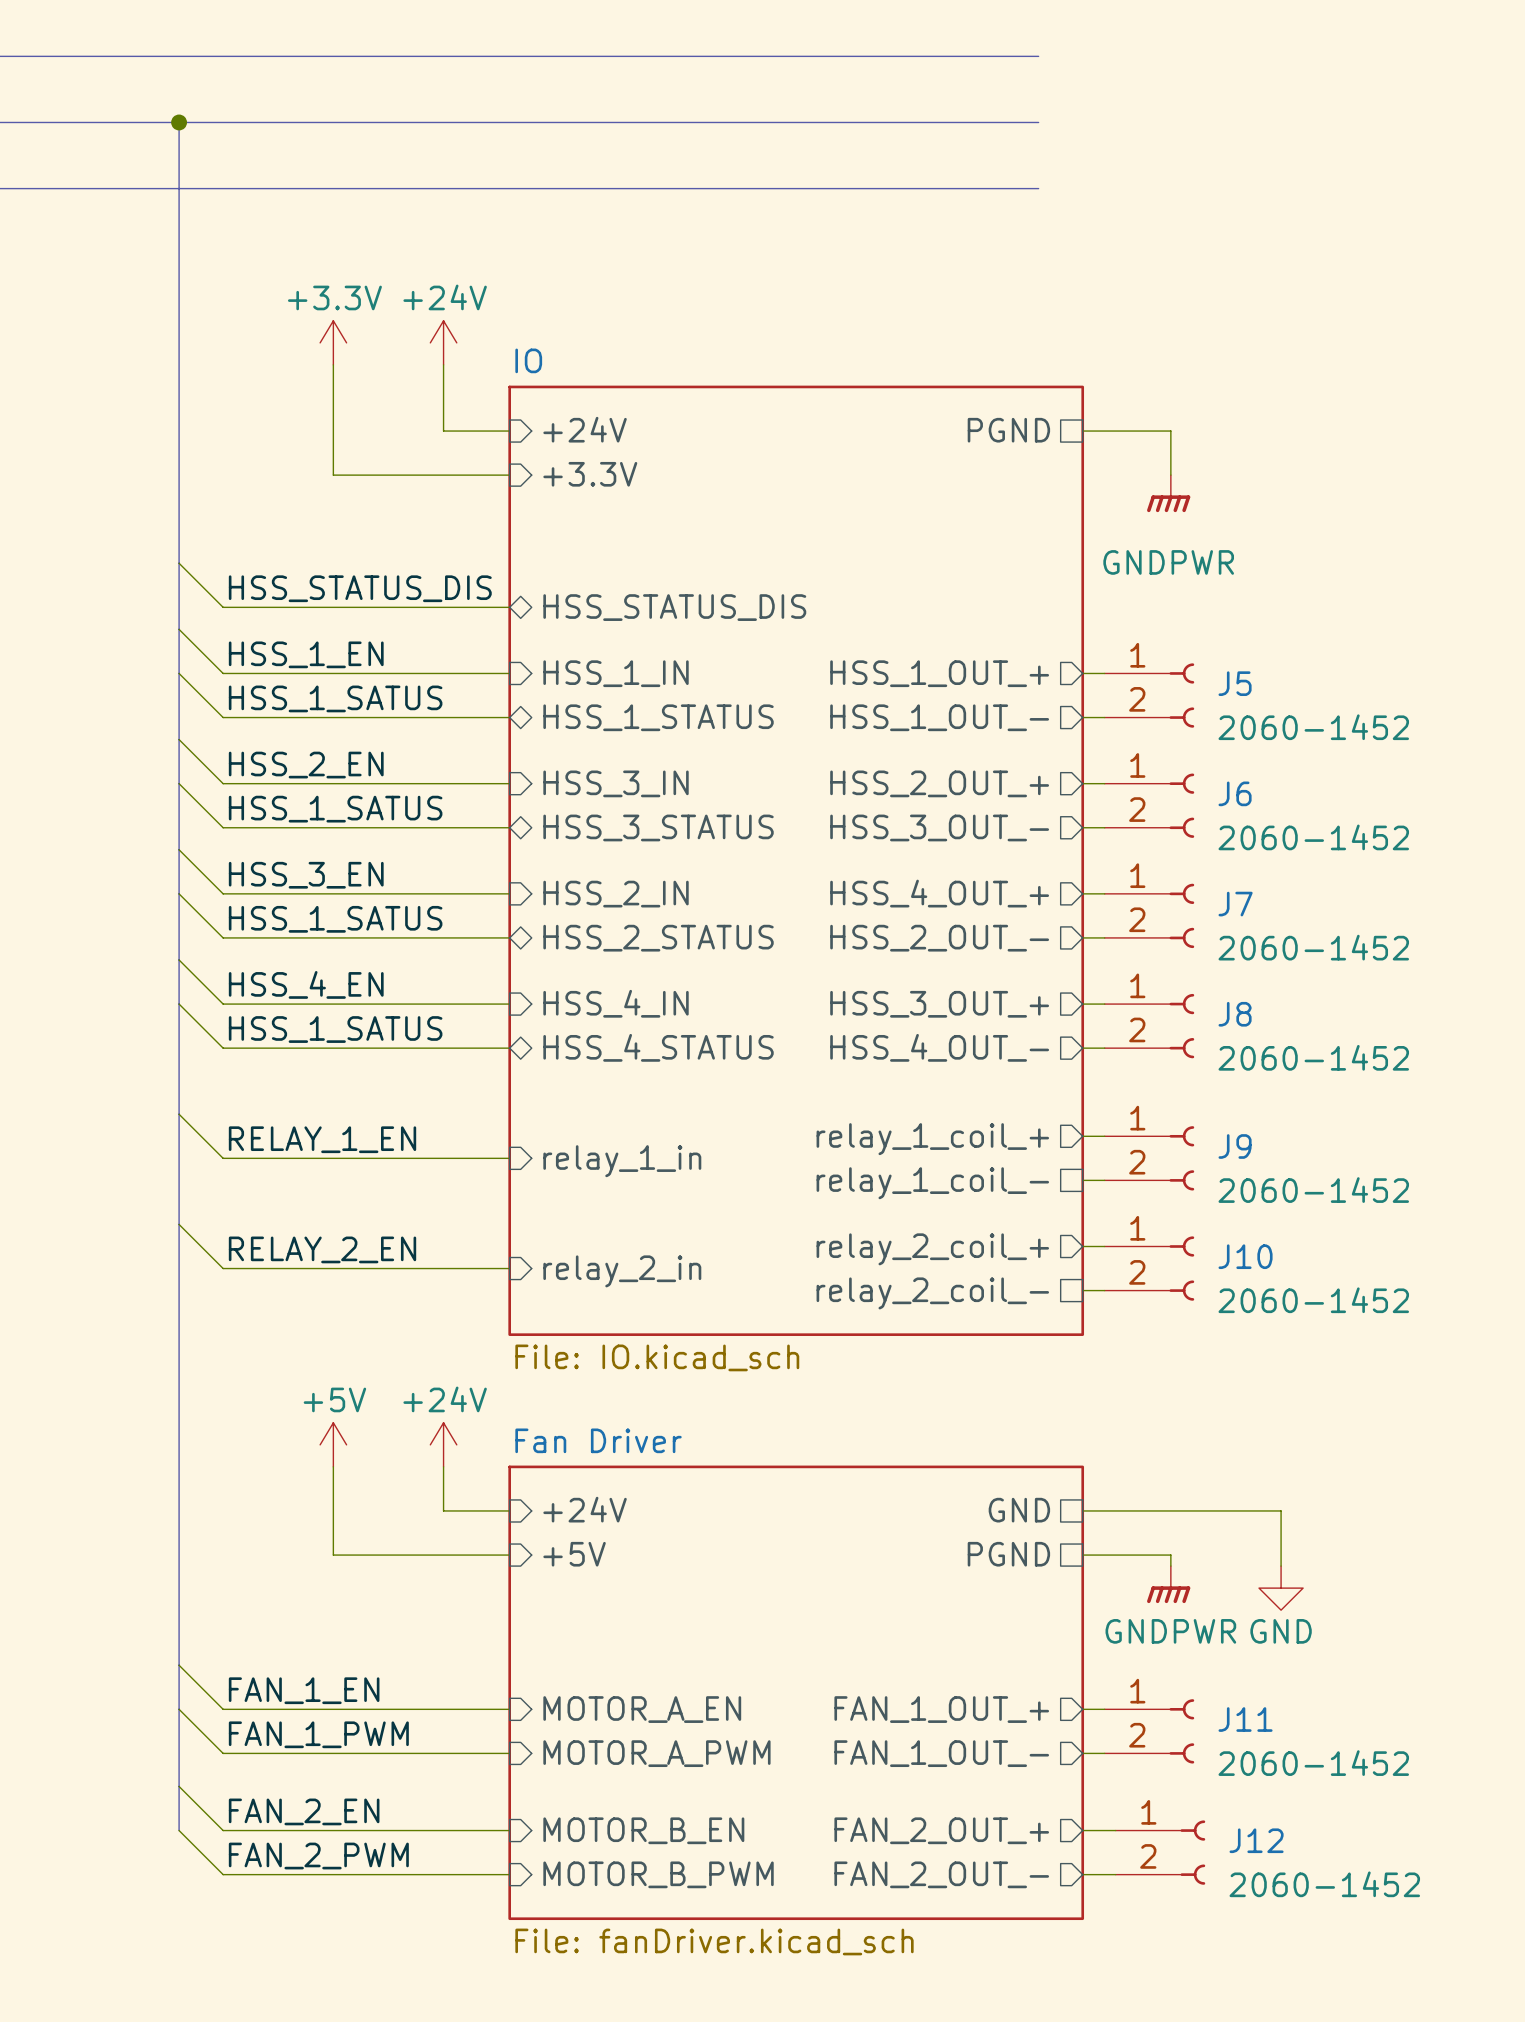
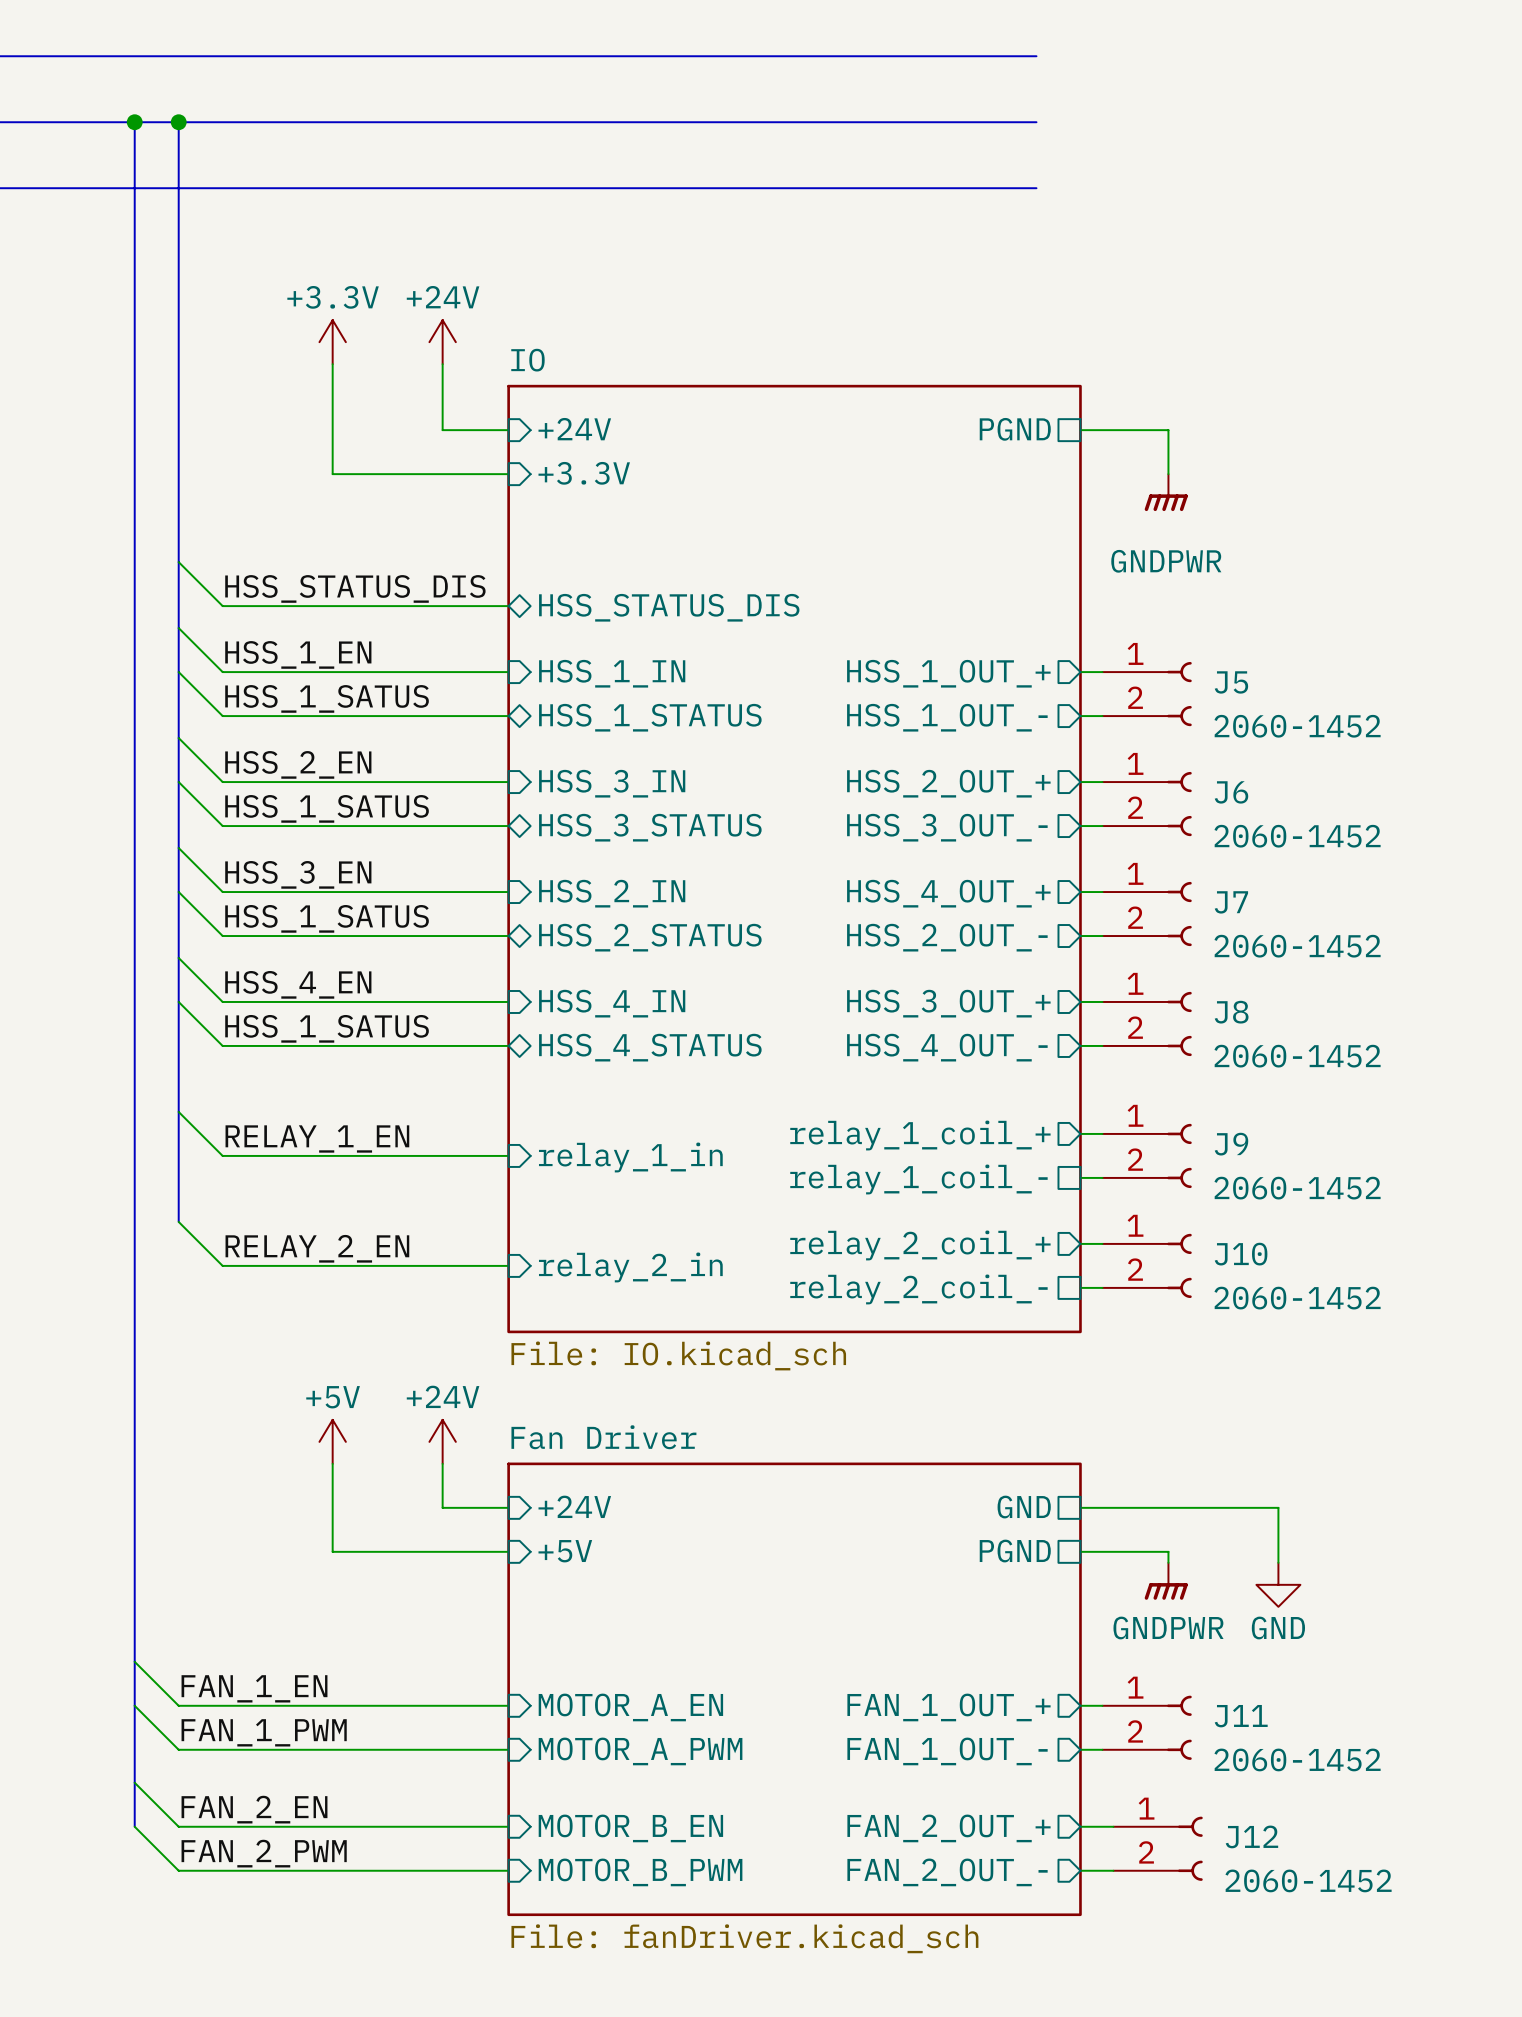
bus: none -> (134, 122) (134, 1826)
junction: none -> (134, 122)
bus: (179, 1224) (179, 1830) -> none
wire: (179, 1665) (223, 1709) -> (134, 1661) (178, 1705) (222, 1705)
label position: FAN_1_EN (304, 1690) -> FAN_1_EN (254, 1688)
wire: (179, 1709) (223, 1753) -> (134, 1705) (178, 1749) (222, 1749)
label position: FAN_1_PWM (318, 1734) -> FAN_1_PWM (264, 1732)
wire: (179, 1786) (223, 1830) -> (134, 1782) (178, 1826) (222, 1826)
label position: FAN_2_EN (304, 1811) -> FAN_2_EN (254, 1809)
wire: (179, 1830) (223, 1874) -> (134, 1826) (178, 1870) (222, 1870)
label position: FAN_2_PWM (318, 1856) -> FAN_2_PWM (264, 1853)

